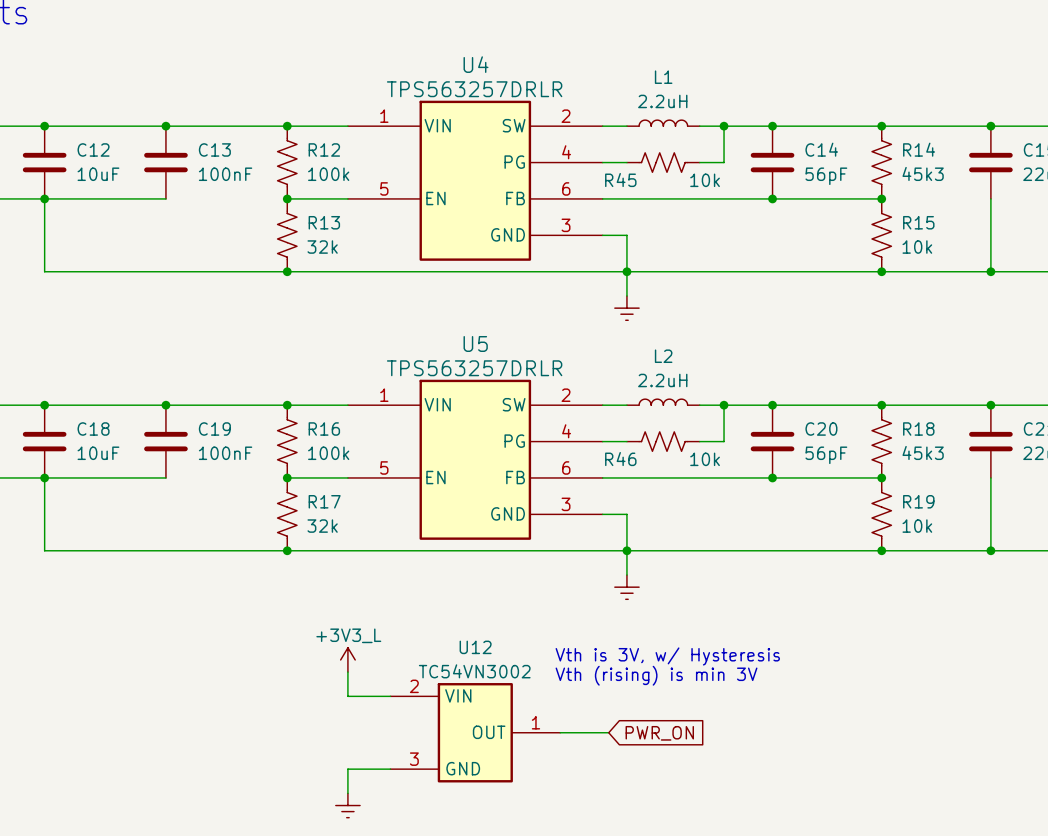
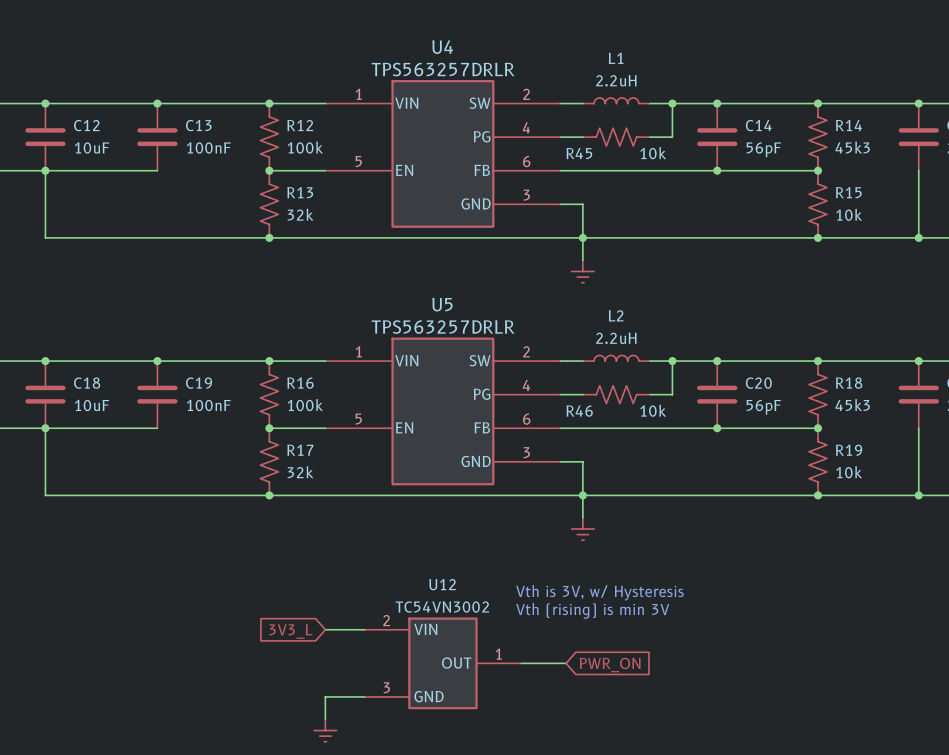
power symbol: +3V3_L (347, 659) -> none
wire: (347, 672) (347, 696) -> none
global label: none -> 3V3_L (290, 631)

